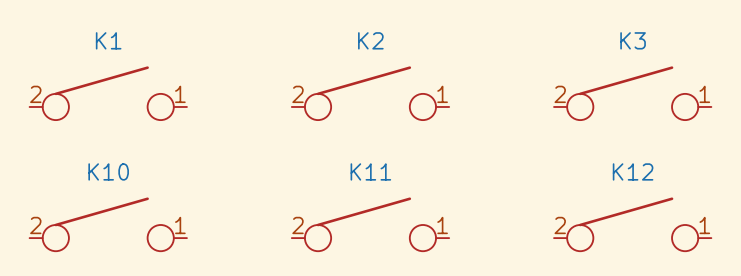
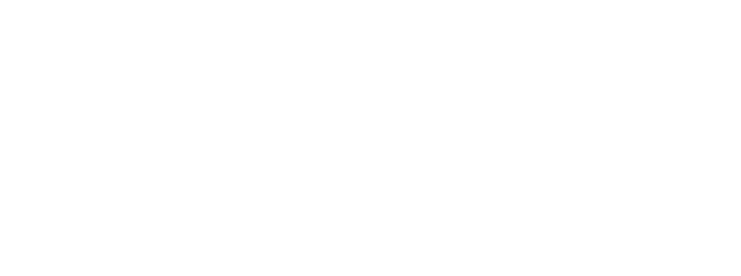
K1: (108, 93) -> none
K2: (370, 93) -> none
K3: (632, 93) -> none
K10: (108, 224) -> none
K11: (370, 224) -> none
K12: (632, 224) -> none

